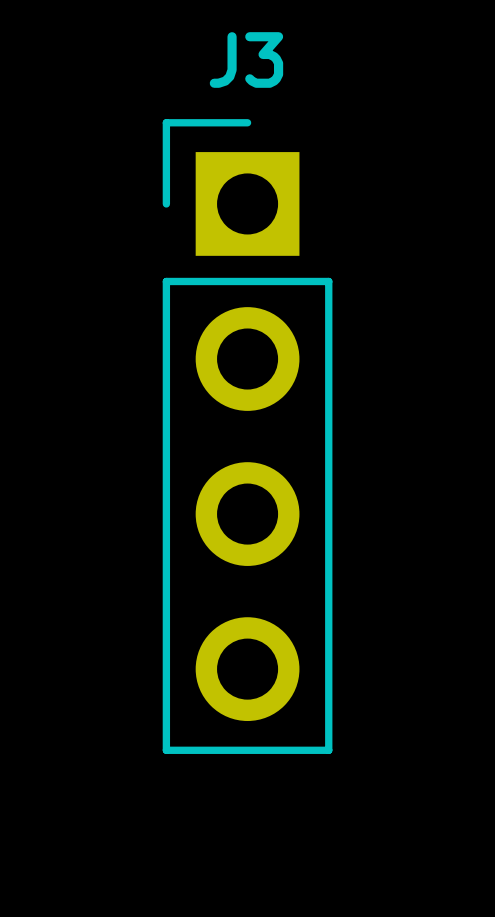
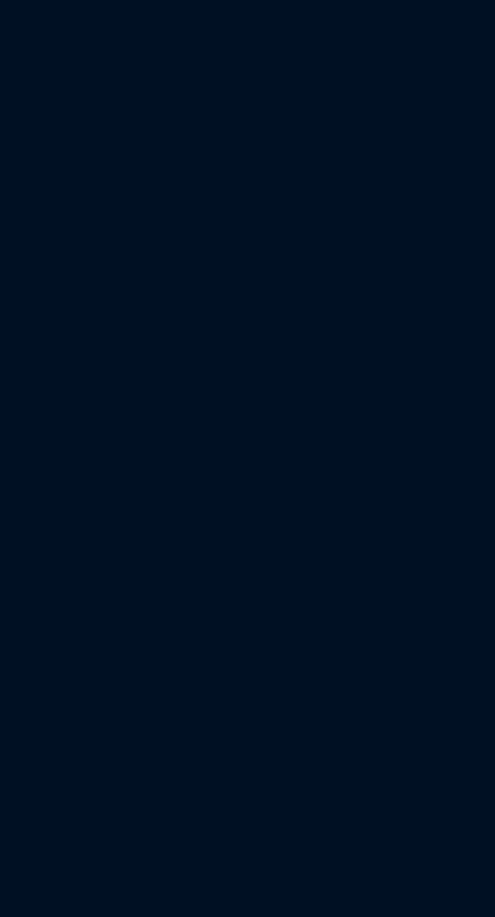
J3: (247, 436) -> none

